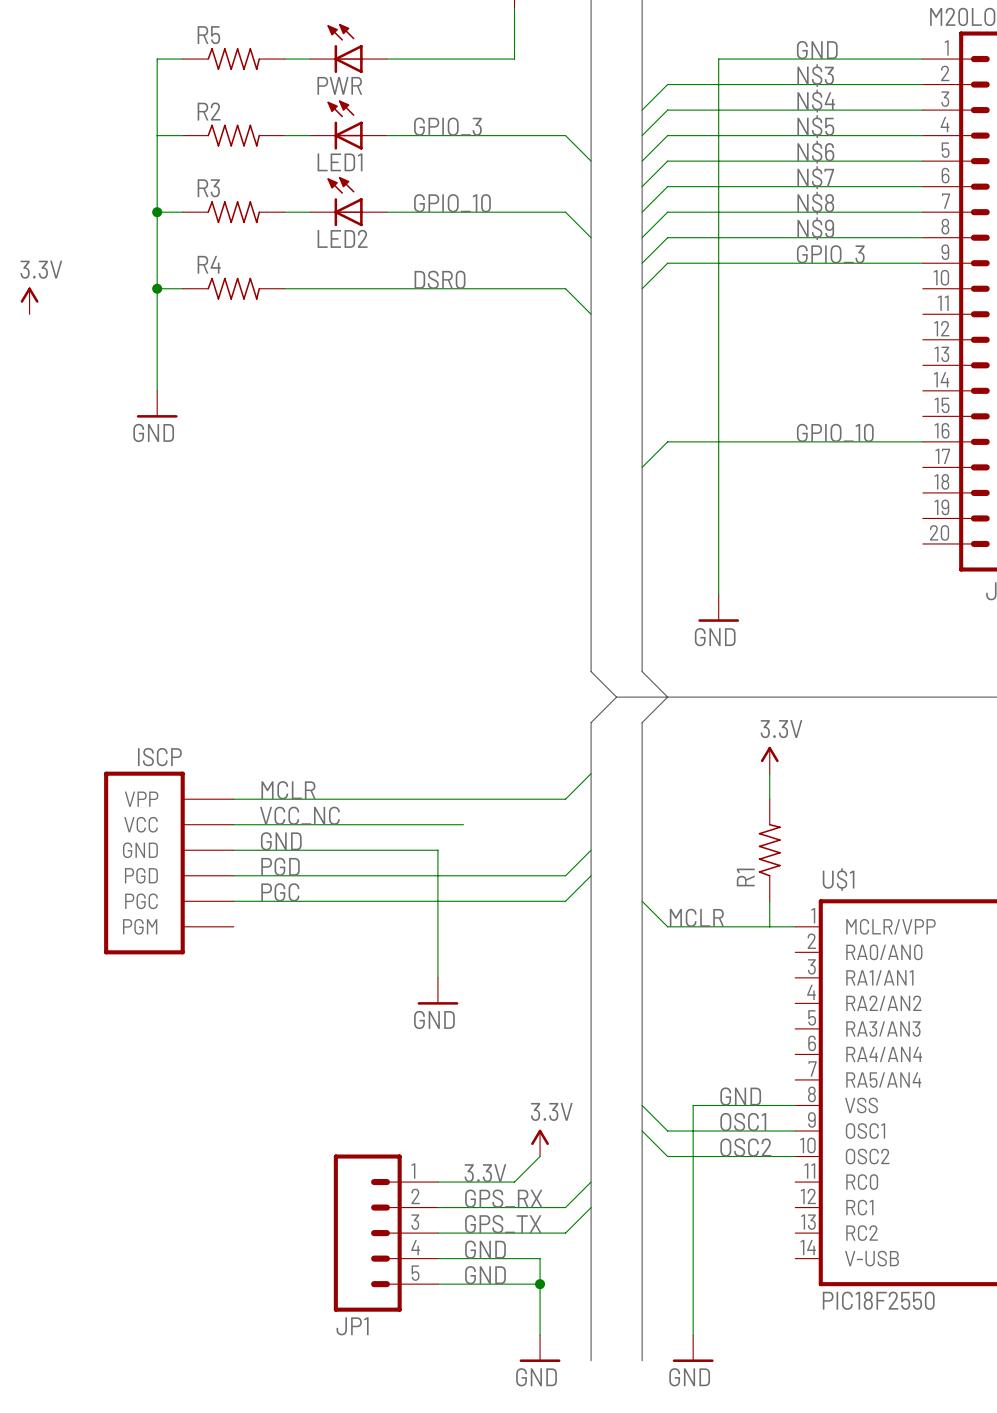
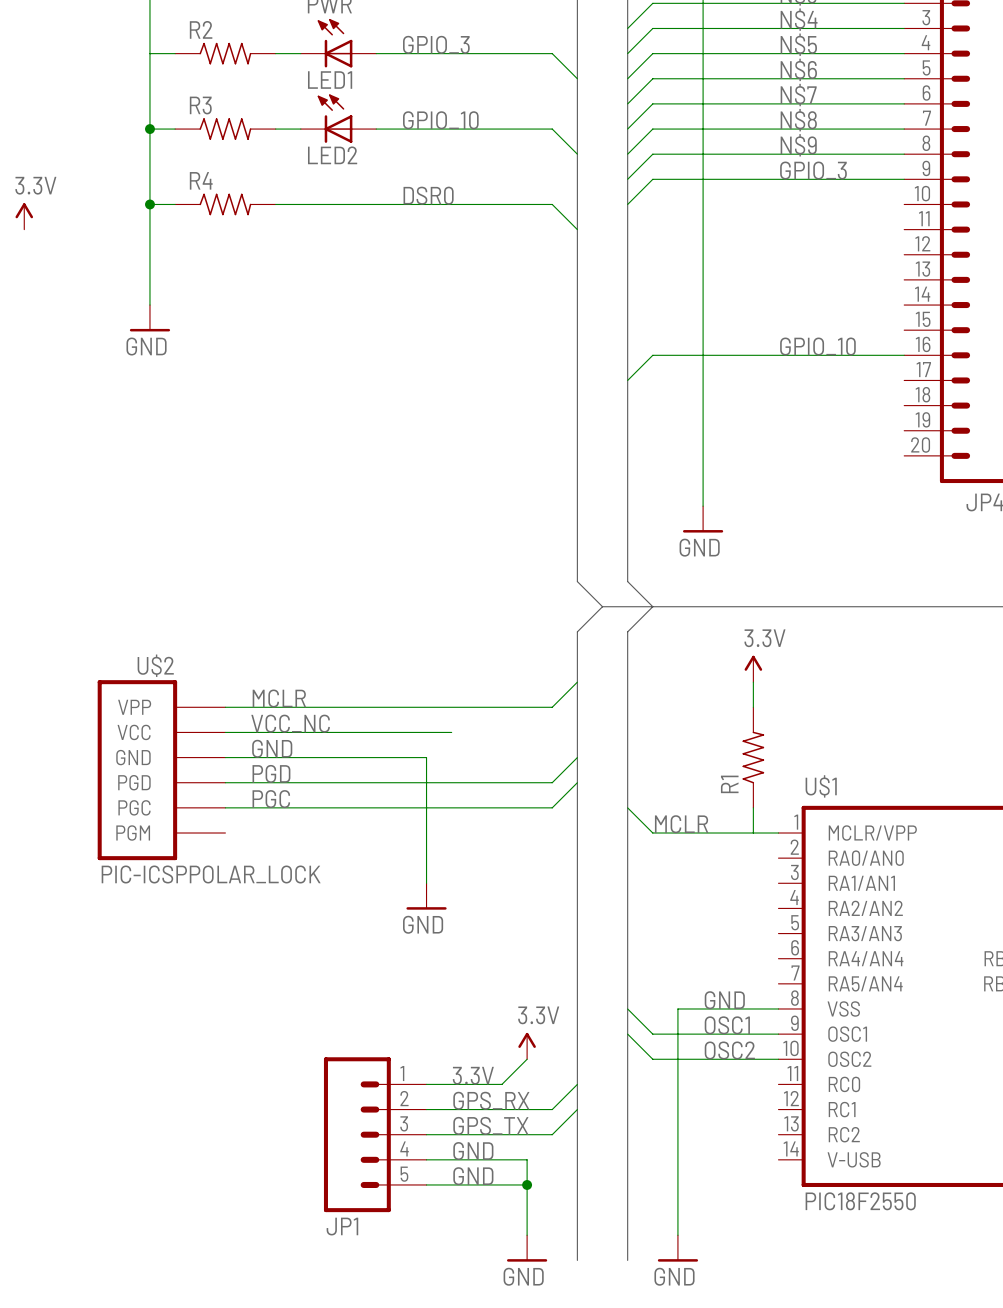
ISCP name: ISCP (159, 757) -> U$2 (155, 665)
ISCP value: none -> PIC-ICSPPOLAR_LOCK (211, 874)

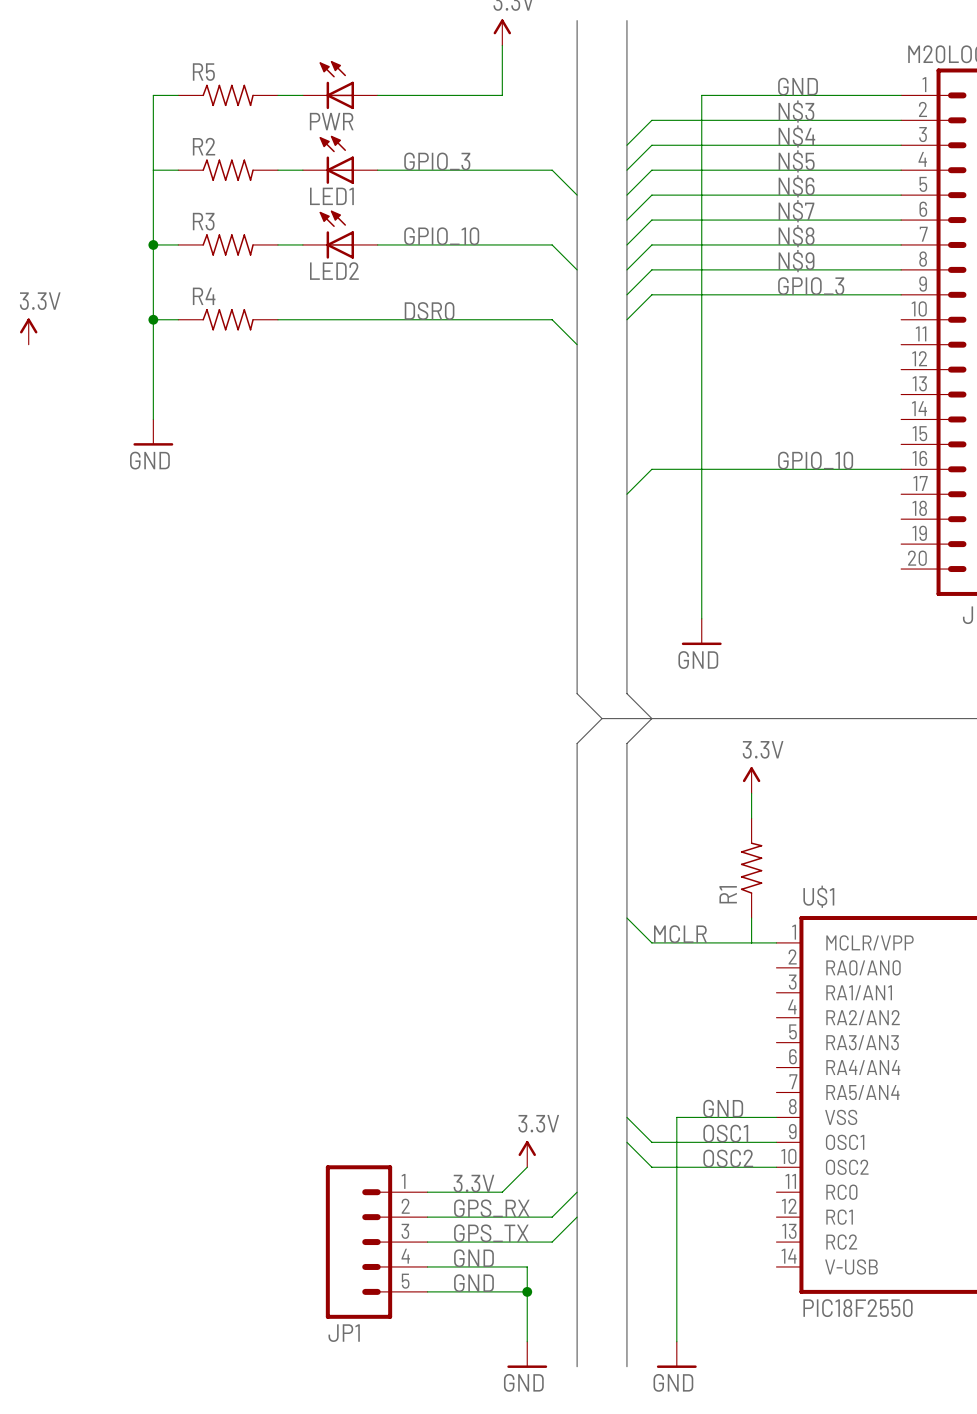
wire: (577, 682) (552, 707) (225, 707) -> none
label: MCLR (279, 698) -> none
label: VCC_NC (290, 723) -> none
wire: (225, 732) (451, 732) -> none
label: GND (272, 748) -> none
wire: (225, 757) (426, 757) (426, 883) -> none
wire: (577, 757) (552, 782) (225, 782) -> none
U$2: PIC-ICSPPOLAR_LOCK (161, 770) -> none
label: PGD (271, 773) -> none
wire: (577, 782) (552, 807) (225, 807) -> none
label: PGC (271, 799) -> none
power symbol: GND (426, 896) -> none

